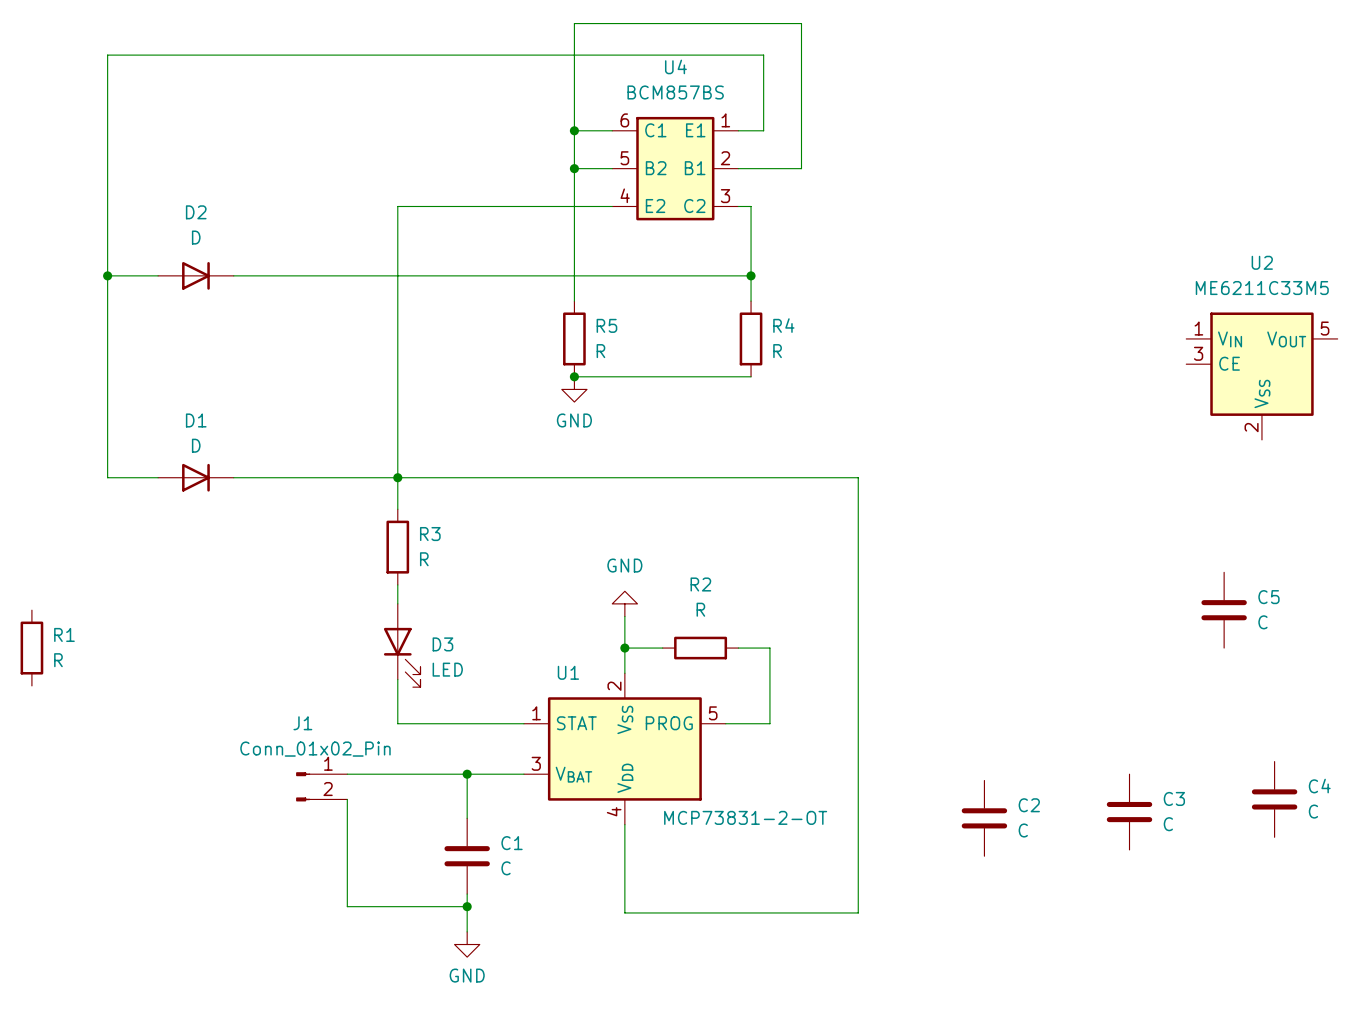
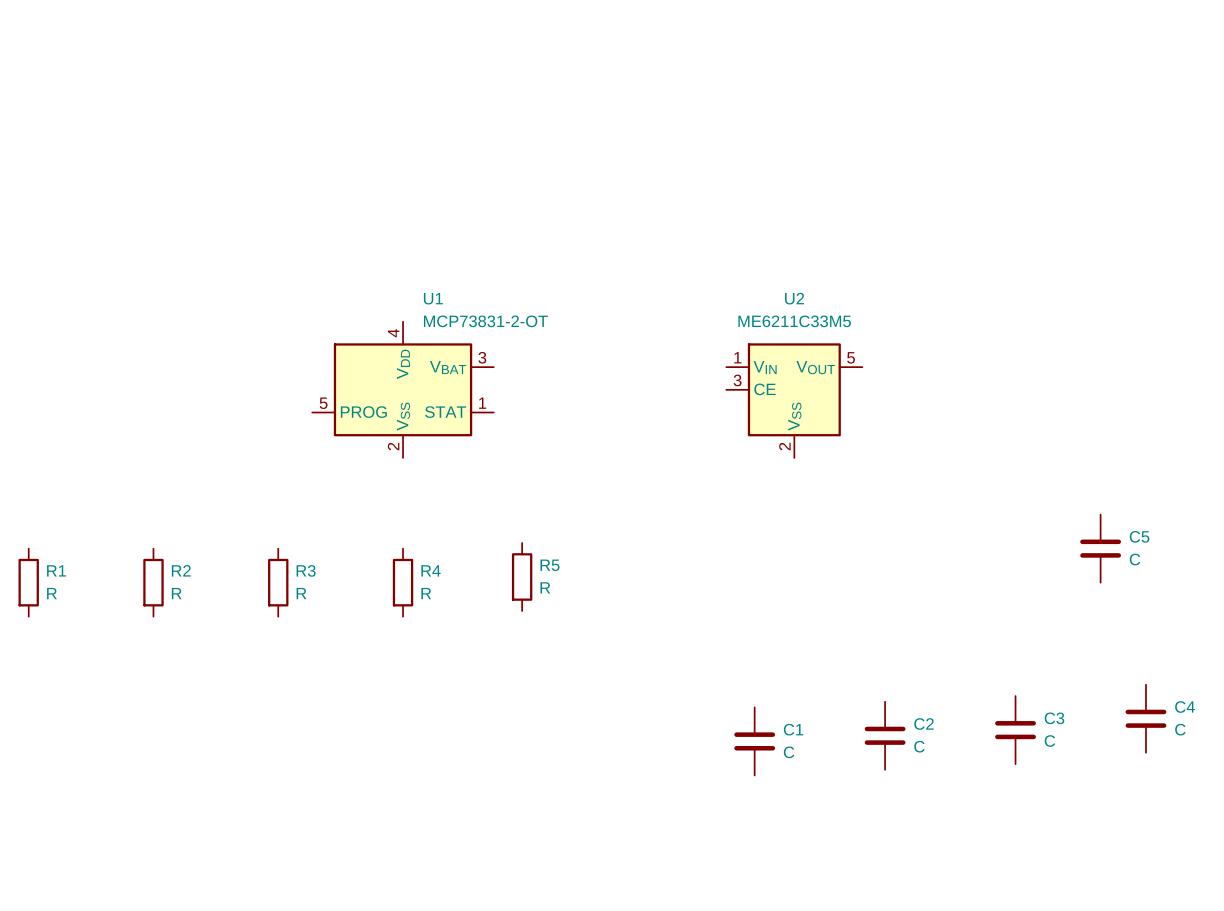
wire: (574, 130) (612, 130) -> none
junction: (574, 130) -> none
wire: (738, 130) (763, 130) (763, 55) (107, 55) (107, 477) (158, 477) -> none
wire: (574, 168) (612, 168) -> none
junction: (574, 168) -> none
U4: BCM857BS (675, 168) -> none
wire: (738, 168) (801, 168) (801, 23) (574, 23) (574, 301) -> none
wire: (612, 206) (397, 206) (397, 509) -> none
wire: (738, 206) (751, 206) (751, 301) -> none
wire: (107, 275) (158, 275) -> none
junction: (107, 275) -> none
D2: D (195, 275) -> none
wire: (233, 275) (751, 275) -> none
junction: (751, 275) -> none
R5 position: (574, 338) -> (522, 576)
R4 position: (751, 338) -> (403, 582)
wire: (574, 376) (751, 376) -> none
junction: (574, 376) -> none
U2 position: (1261, 376) -> (794, 400)
power symbol: GND (574, 389) -> none
D1: D (195, 477) -> none
wire: (233, 477) (858, 477) (858, 912) (624, 912) (624, 824) -> none
junction: (397, 477) -> none
R3 position: (397, 547) -> (278, 582)
wire: (397, 584) (397, 603) -> none
R2 name position: R2 (700, 584) -> R2 (181, 570)
power symbol: GND (624, 603) -> none
wire: (624, 616) (624, 673) -> none
D3: LED (402, 645) -> none
wire: (624, 648) (662, 648) -> none
junction: (624, 648) -> none
R2 rotation: 0° (700, 648) -> 90° clockwise (153, 582)
R2 position: (700, 648) -> (153, 582)
wire: (738, 648) (769, 648) (769, 723) (725, 723) -> none
U1 name position: U1 (568, 672) -> U1 (433, 298)
wire: (397, 679) (397, 723) (523, 723) -> none
U1 rotation: 0° (624, 748) -> 180° (403, 389)
U1 position: (624, 748) -> (403, 389)
wire: (347, 774) (523, 774) -> none
wire: (467, 774) (467, 818) -> none
junction: (467, 774) -> none
J1: Conn_01x02_Pin (321, 786) -> none
wire: (347, 799) (347, 906) (467, 906) -> none
U1 value position: MCP73831-2-OT (745, 817) -> MCP73831-2-OT (485, 321)
C1 position: (467, 856) -> (754, 741)
wire: (467, 894) (467, 931) -> none
junction: (467, 906) -> none
power symbol: GND (467, 944) -> none

